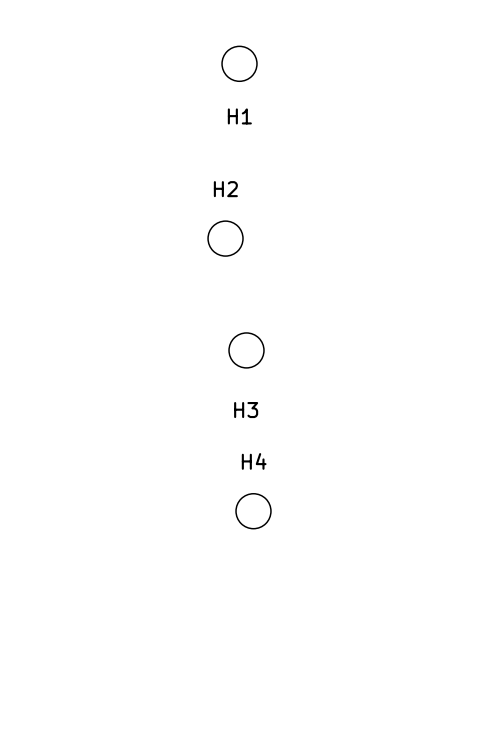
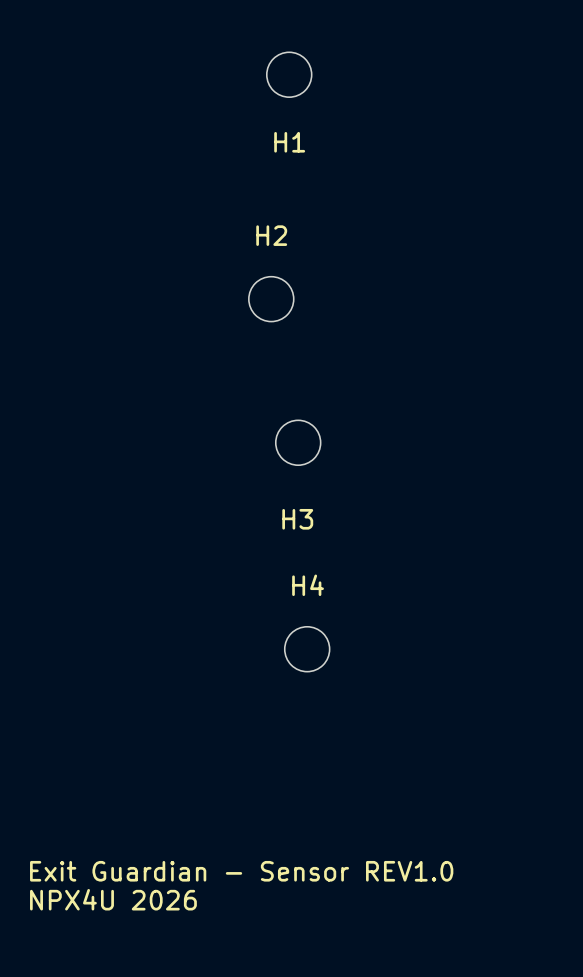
text: none -> Exit Guardian - Sensor REV1.0 (241, 871)
text: none -> NPX4U 2026 (113, 899)

